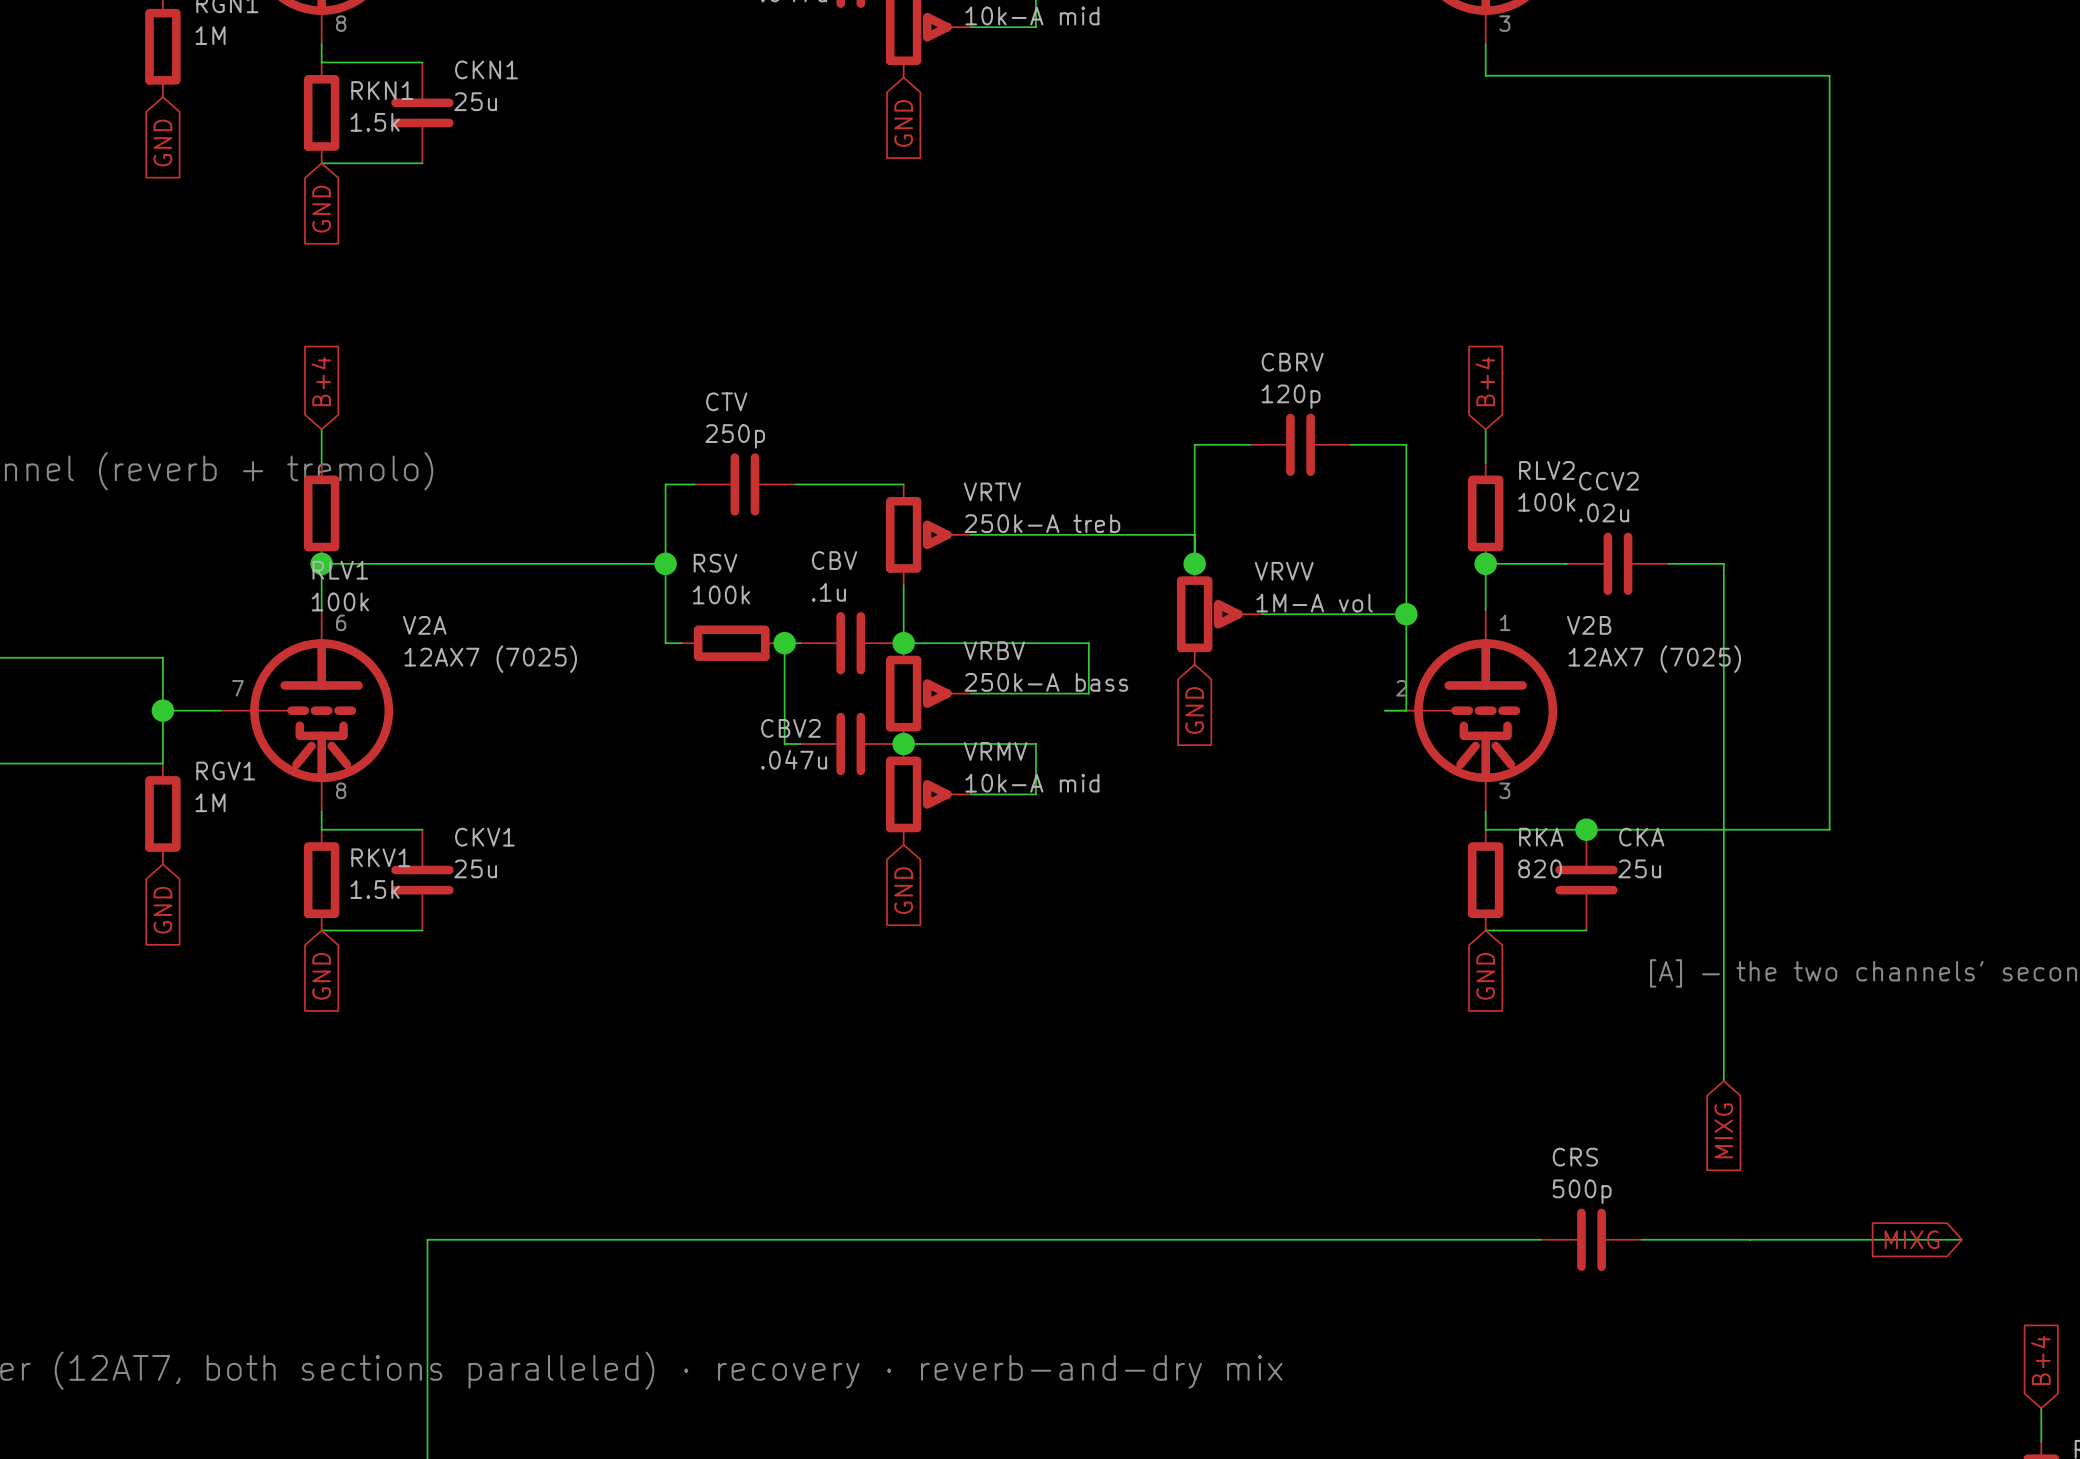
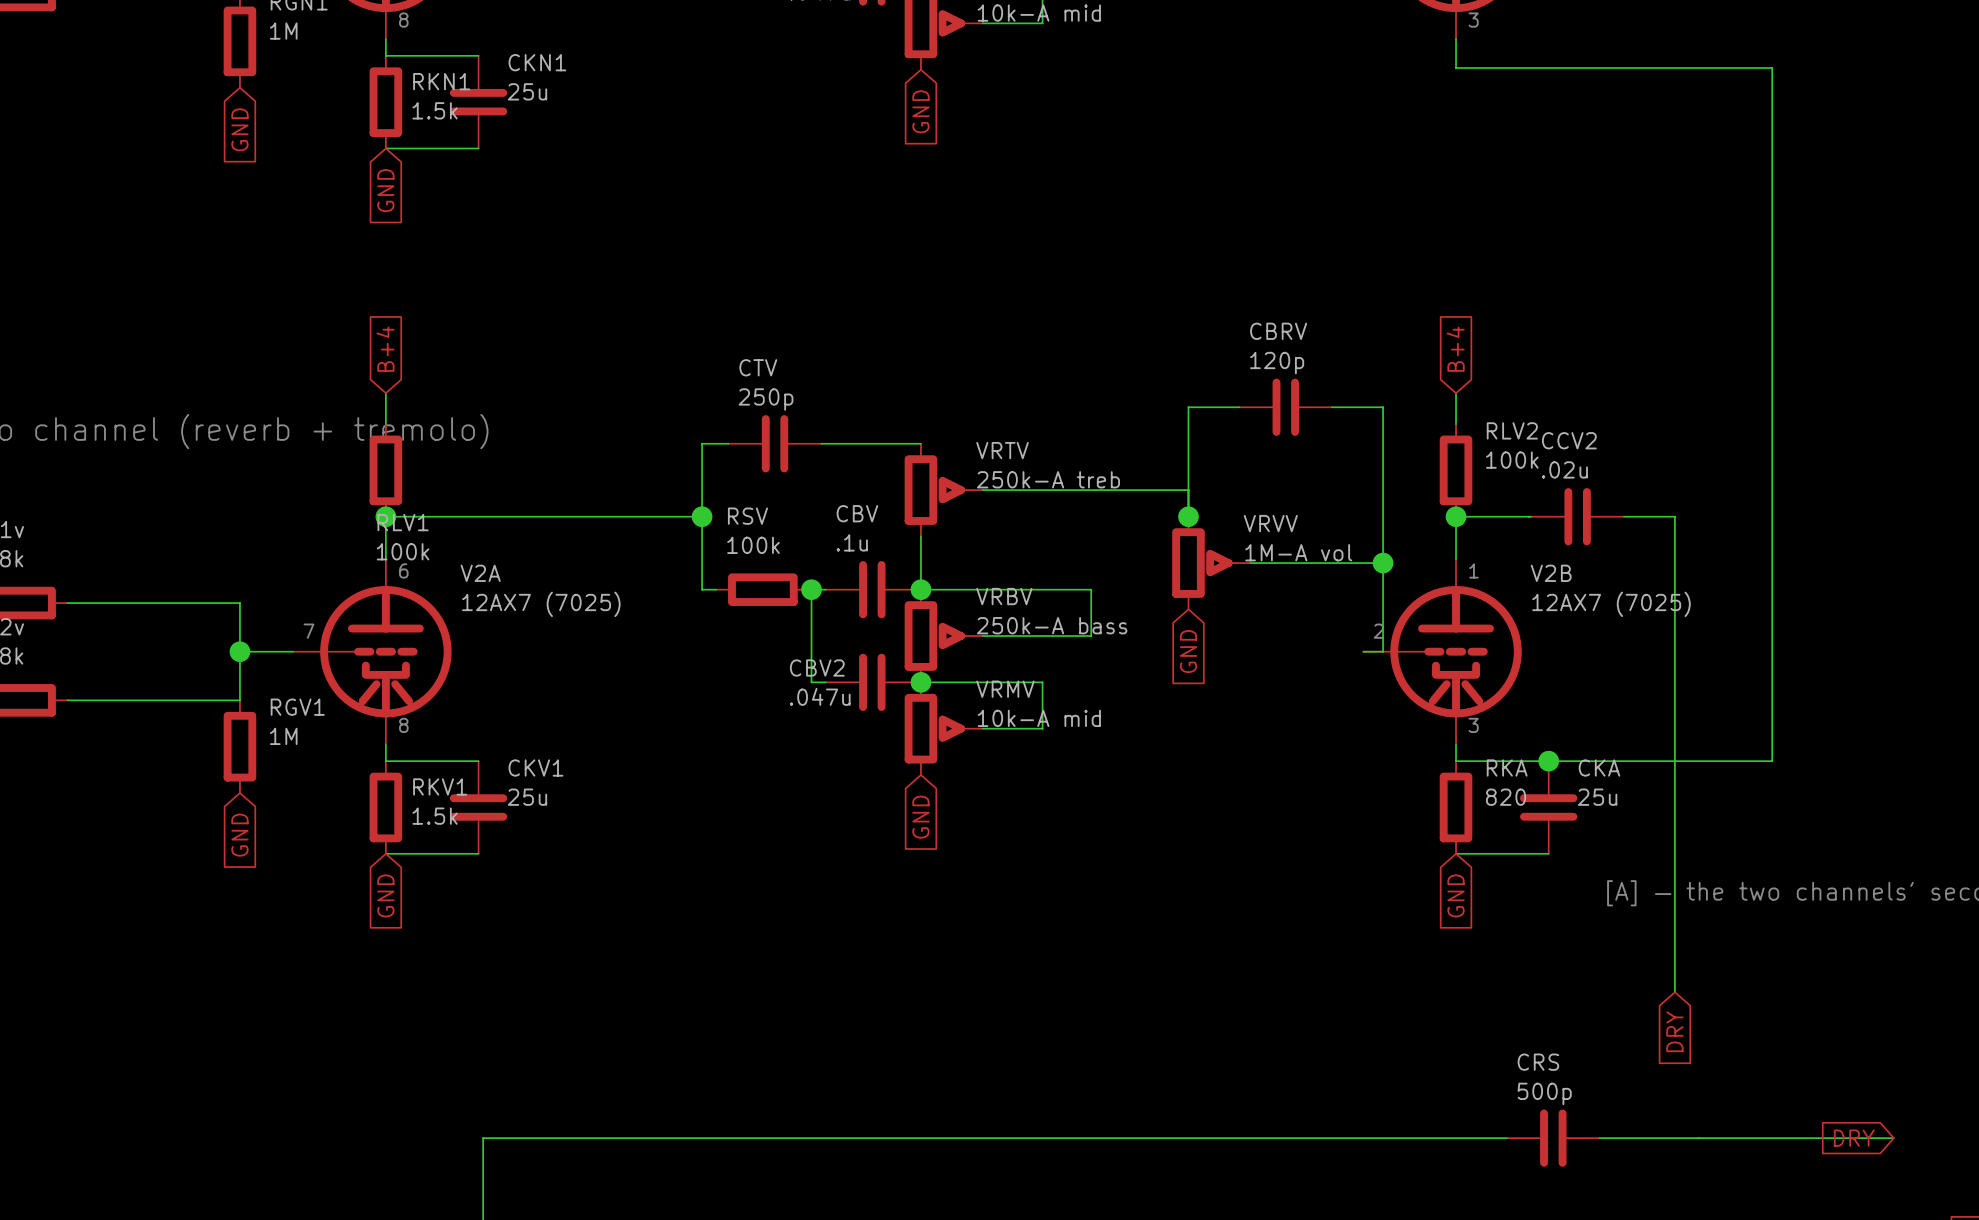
global label: MIXG (1723, 1130) -> DRY (1674, 1031)
global label: MIXG (1912, 1239) -> DRY (1854, 1138)

